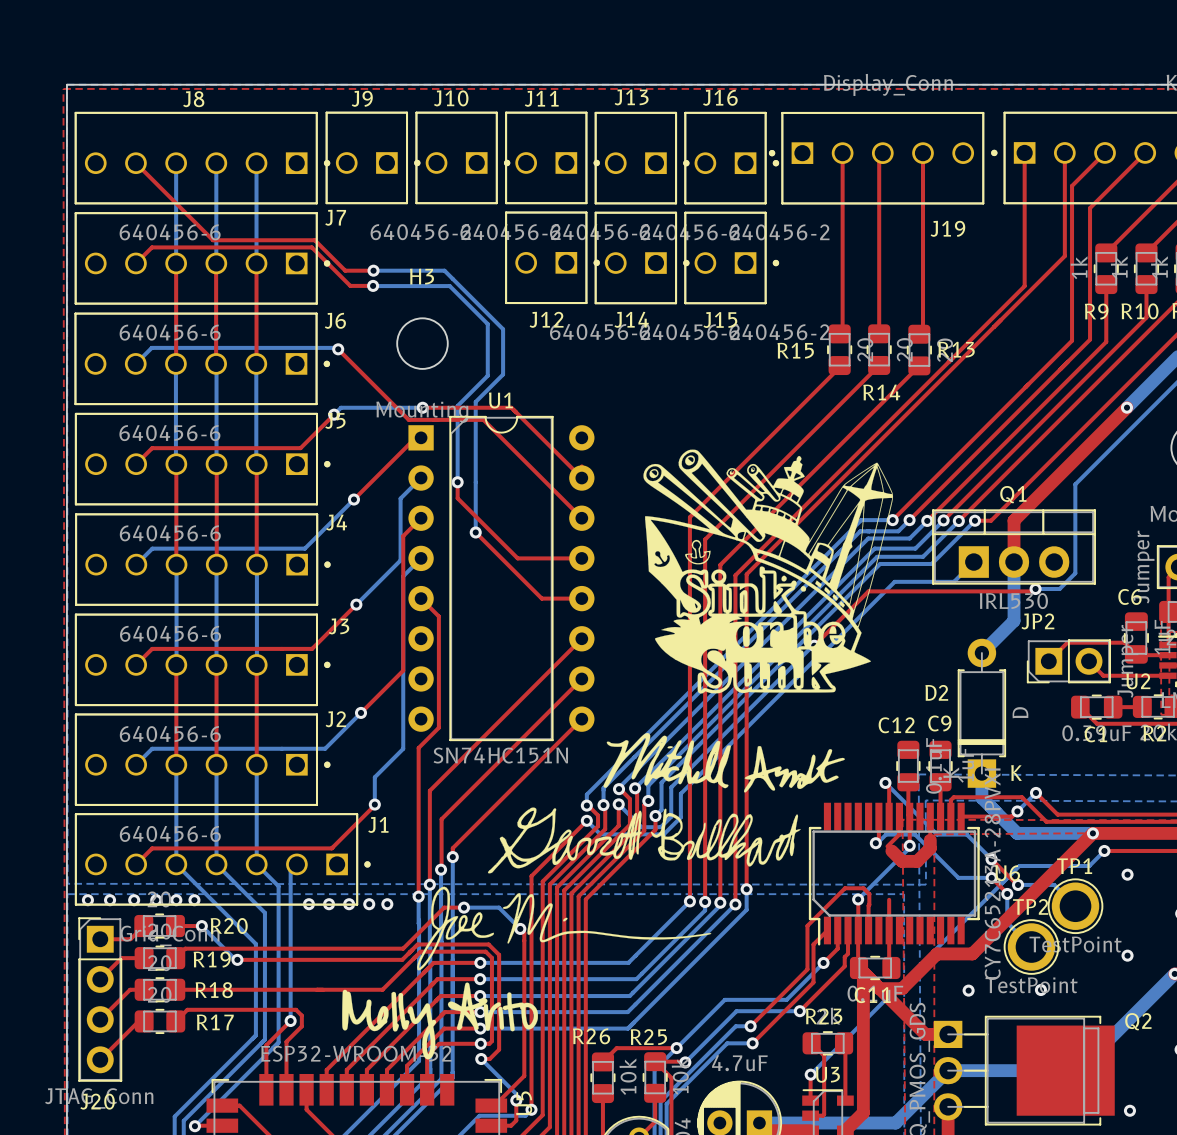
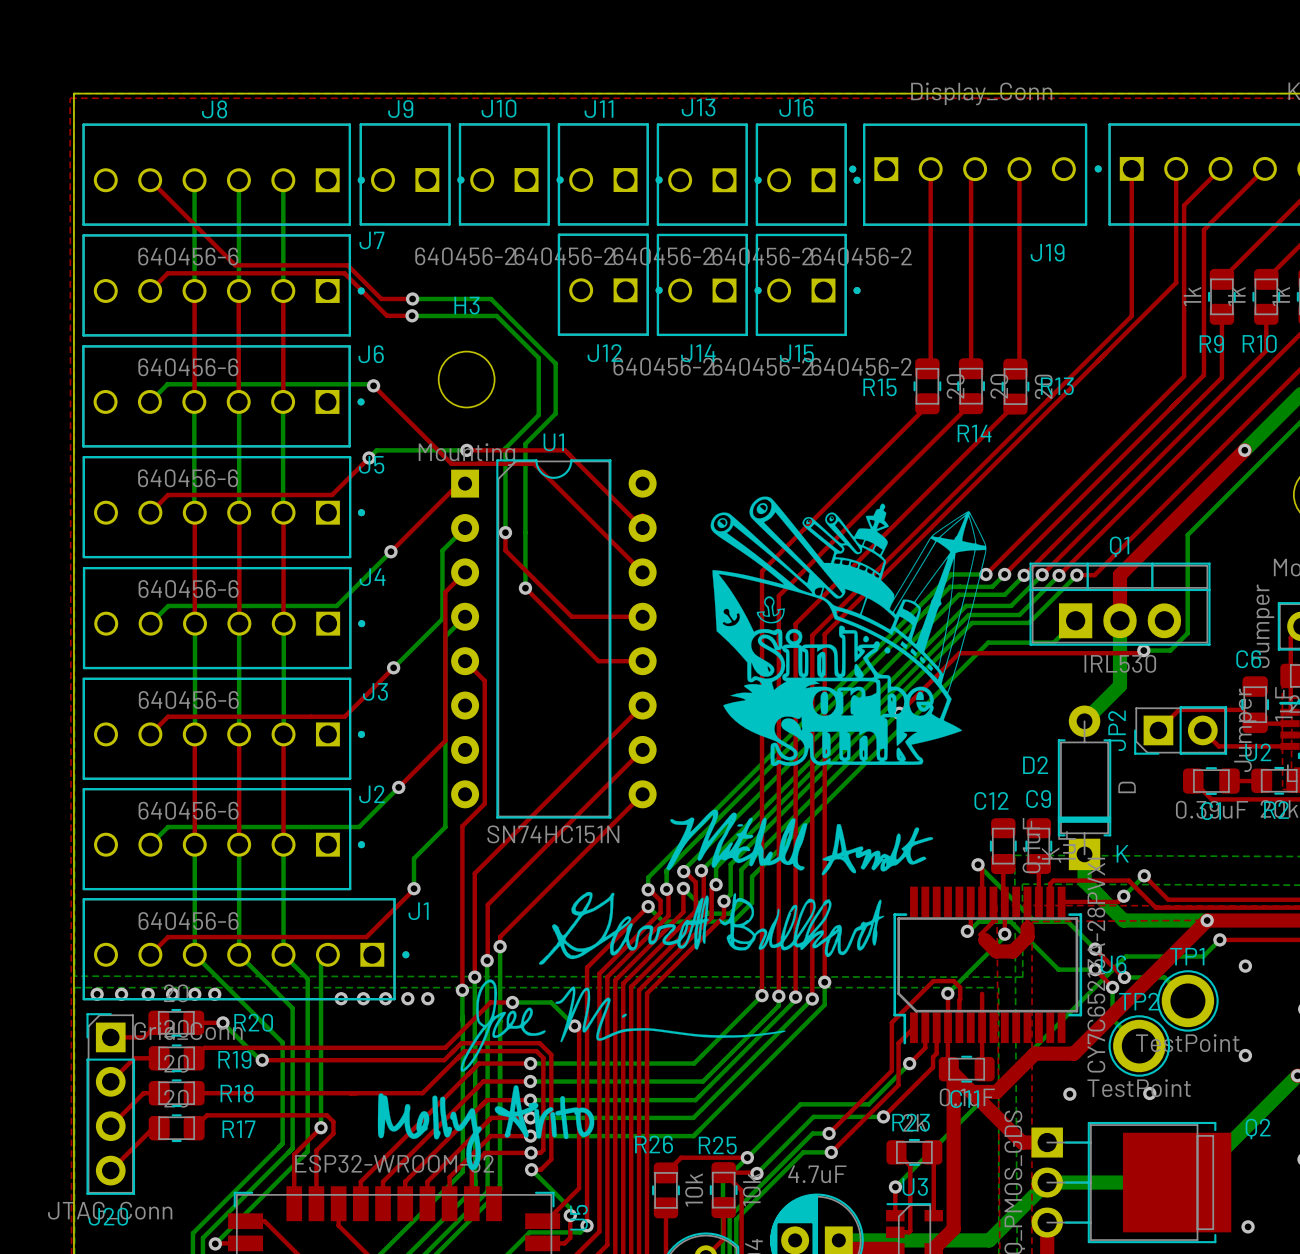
JP2 name rotation: 0° (1037, 621) -> 90° counterclockwise (1117, 730)

